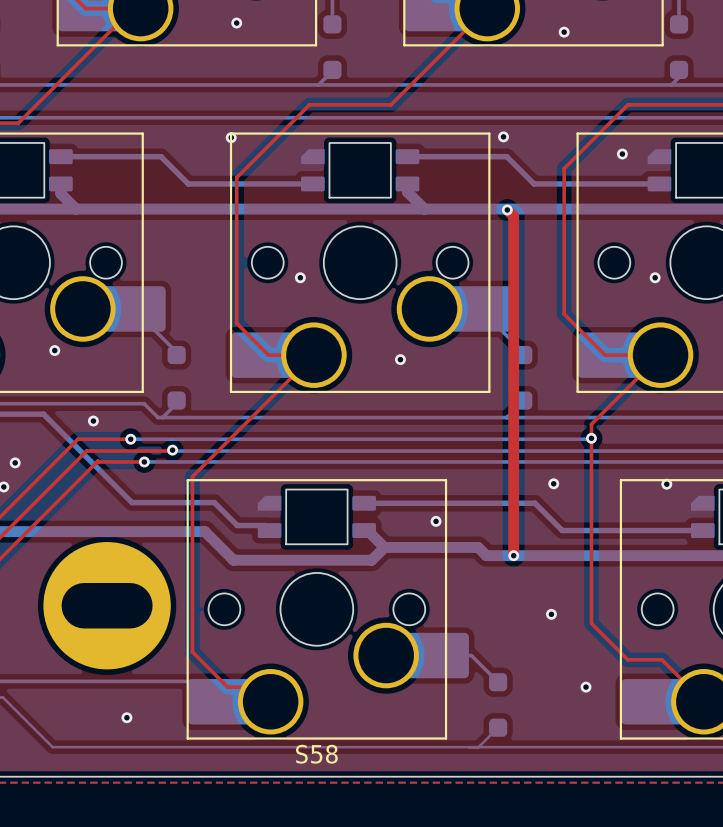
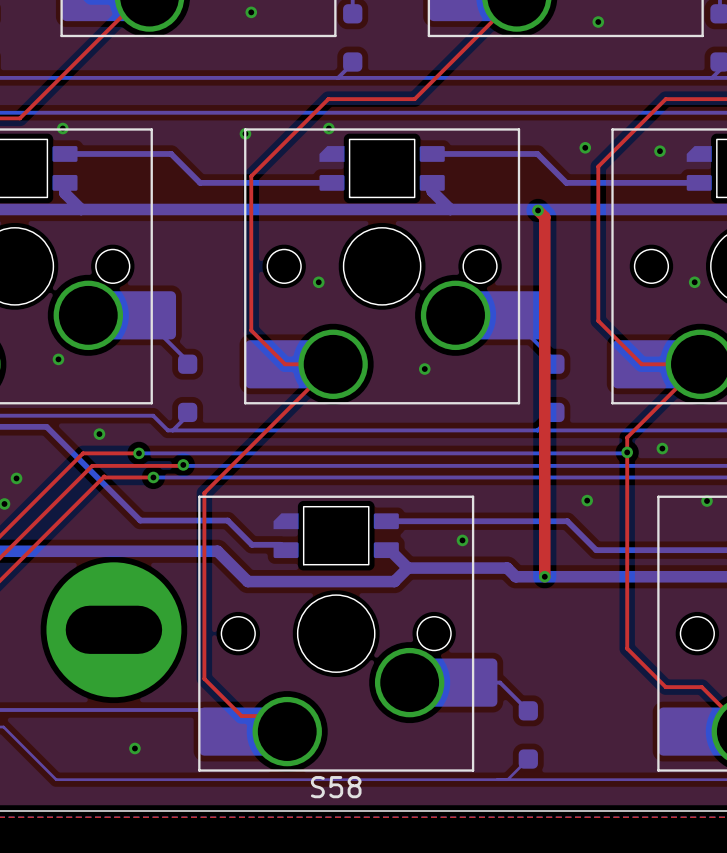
via: none -> (62, 128)
via: none -> (328, 128)
via position: (503, 136) -> (585, 147)
via: none -> (662, 448)
via: (551, 614) -> none
via: (586, 687) -> none

